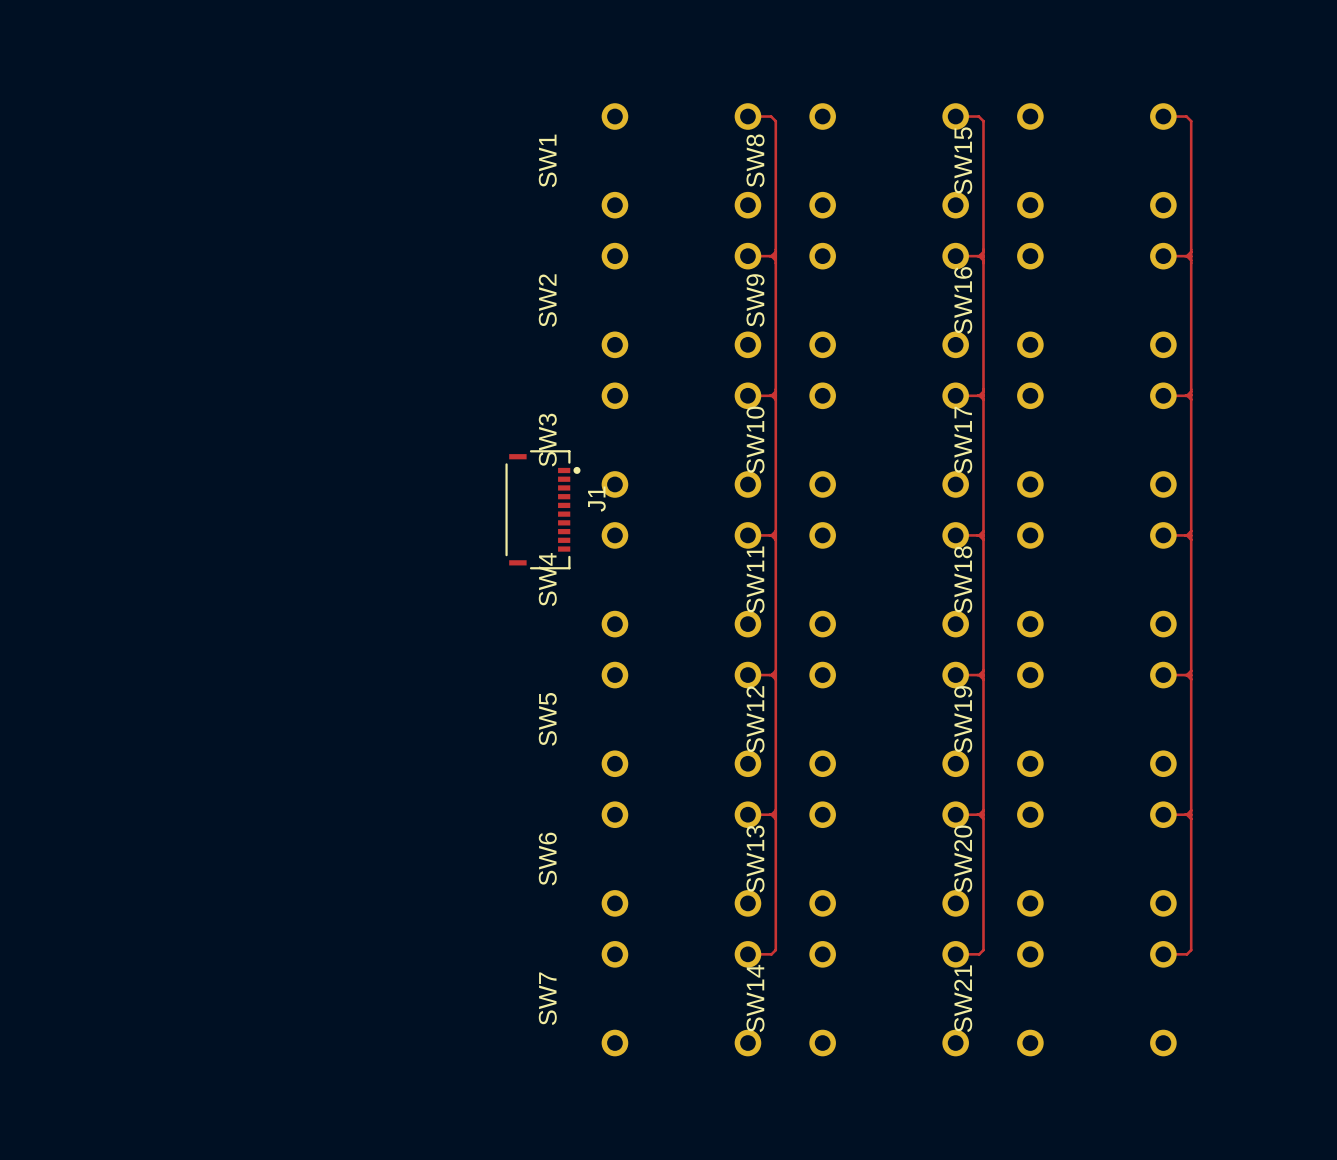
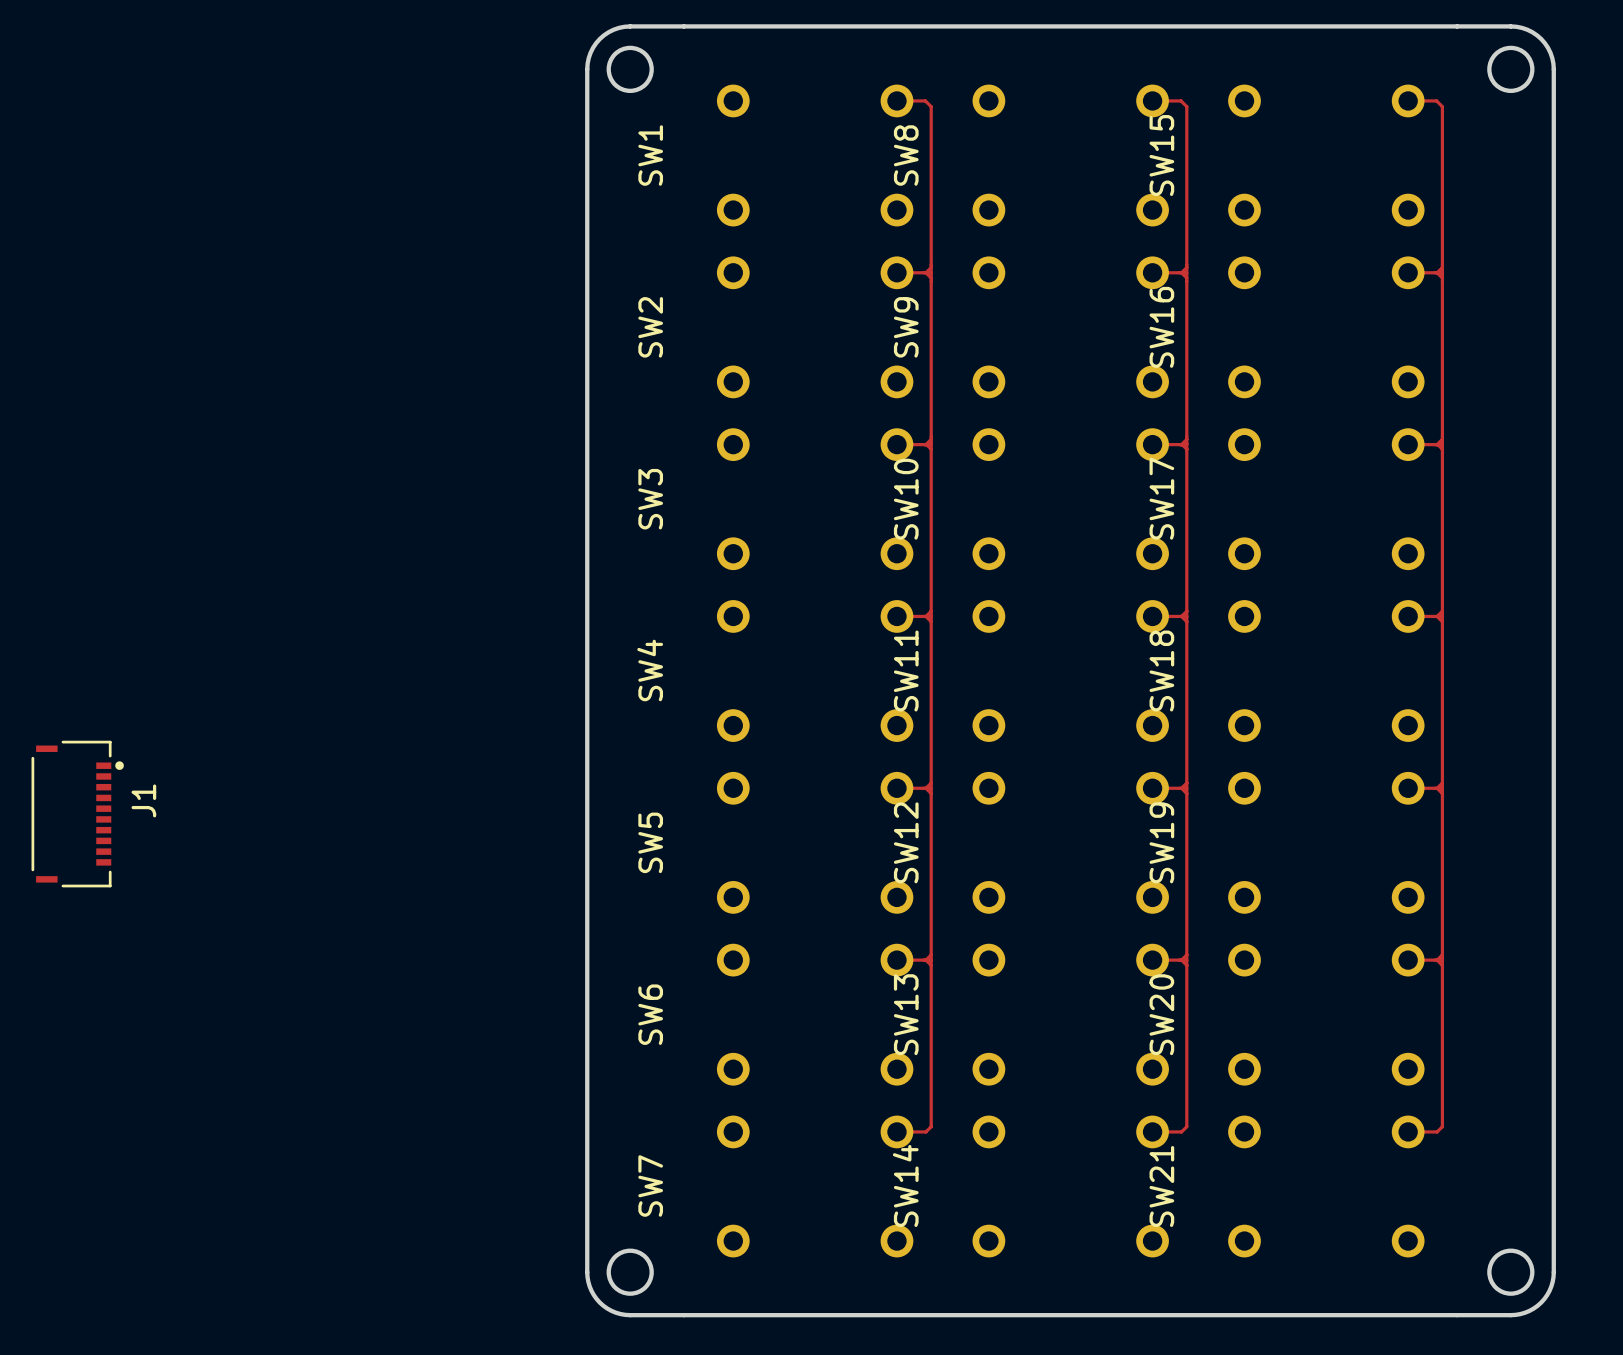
board edge: none -> (630, 26) (1510, 26) (1527, 29) (1544, 43) (1552, 58) (1553, 69) (1553, 1272) (1549, 1290) (1544, 1298) (1533, 1308) (1520, 1314) (1510, 1315) (630, 1315) (616, 1312) (607, 1308) (593, 1295) (589, 1286) (587, 1272) (587, 69) (590, 52) (599, 39) (613, 29) (630, 26)
round board edge: none -> [606, 45, 654, 94]
round board edge: none -> [1487, 45, 1535, 94]
J1 position: (542, 509) -> (77, 814)
round board edge: none -> [606, 1248, 654, 1296]
round board edge: none -> [1487, 1248, 1535, 1296]

